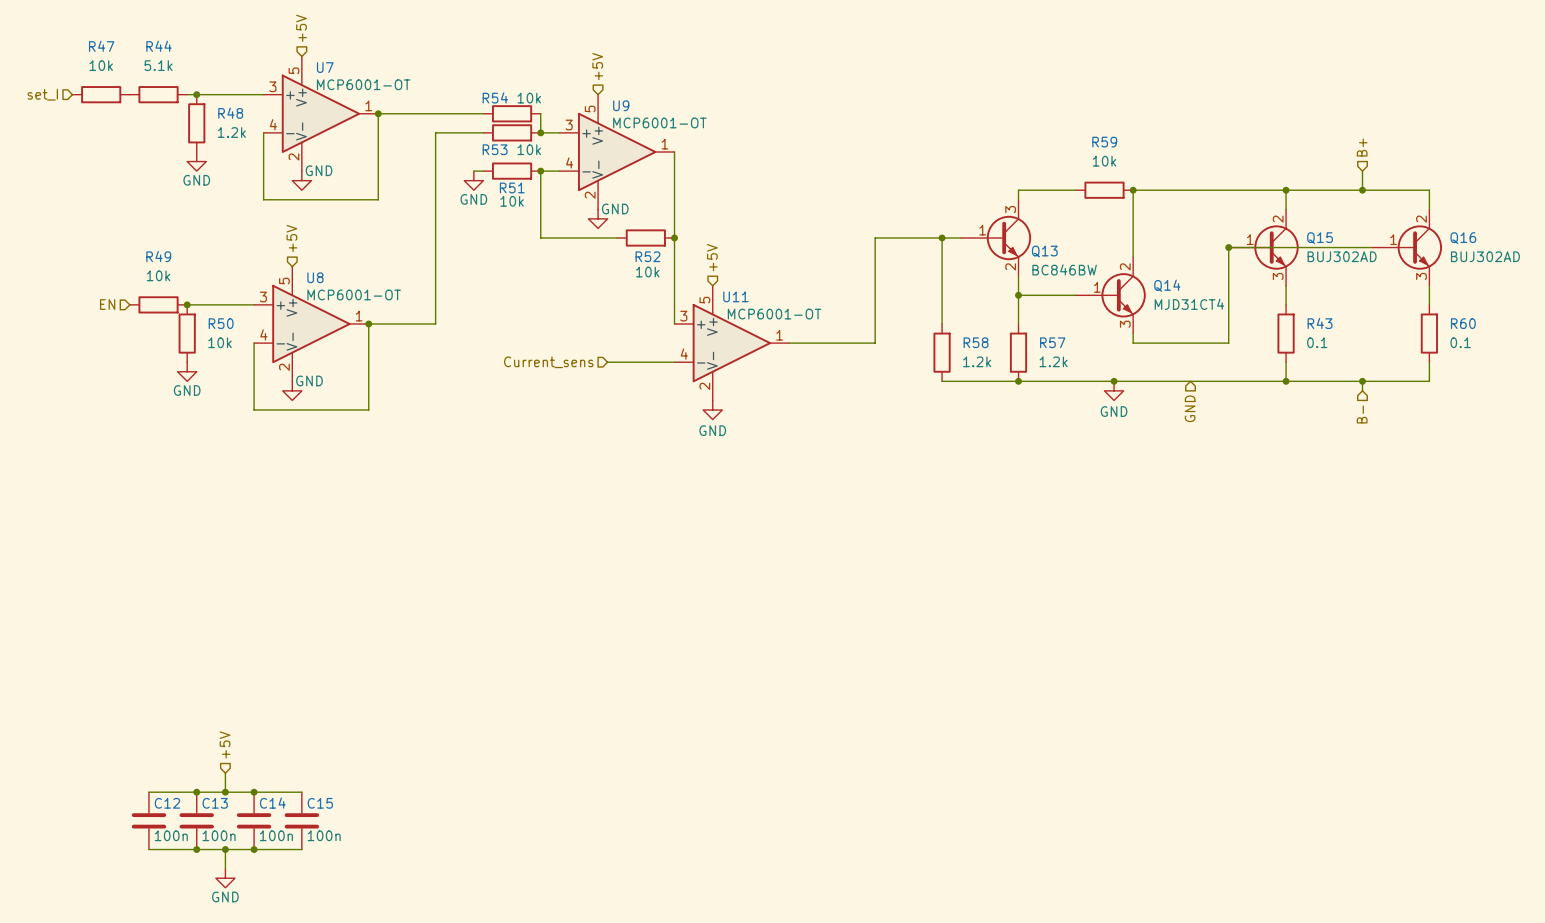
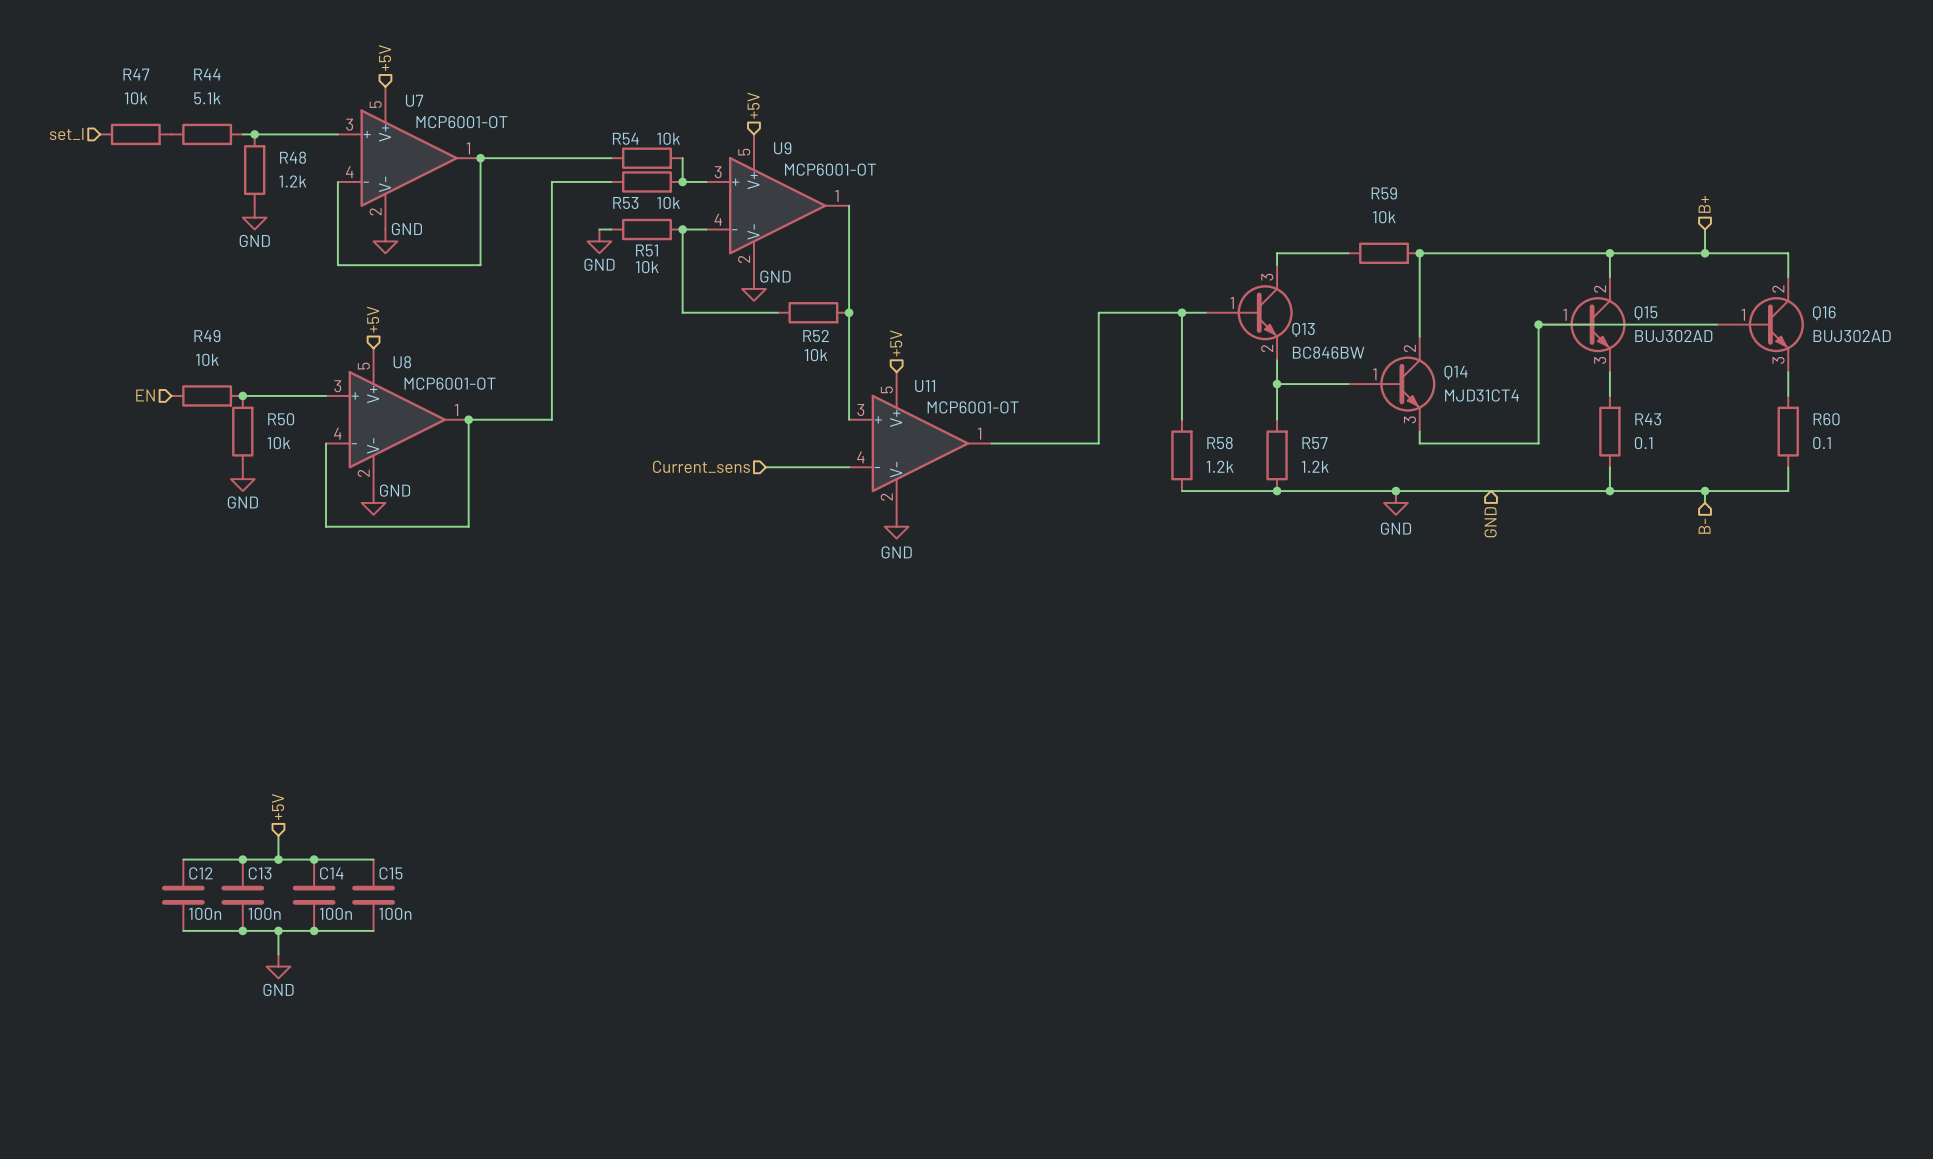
junction: none -> (242, 859)
junction: none -> (278, 859)
junction: none -> (314, 859)
junction: none -> (242, 930)
junction: none -> (278, 930)
junction: none -> (314, 930)
hierarchical label position: +5V (225, 744) -> +5V (278, 807)
wire: (225, 773) (225, 792) -> (278, 835) (278, 859)
wire: (148, 792) (301, 792) -> (183, 859) (373, 859)
junction: (196, 792) -> none
junction: (225, 792) -> none
junction: (254, 792) -> none
C12 position: (148, 820) -> (183, 895)
C13 position: (196, 820) -> (242, 895)
C14 position: (254, 820) -> (314, 895)
C15 position: (301, 820) -> (373, 895)
wire: (148, 849) (301, 849) -> (183, 930) (373, 930)
junction: (196, 849) -> none
wire: (225, 849) (225, 868) -> (278, 930) (278, 954)
junction: (225, 849) -> none
junction: (254, 849) -> none
power symbol position: GND (225, 878) -> GND (278, 966)

